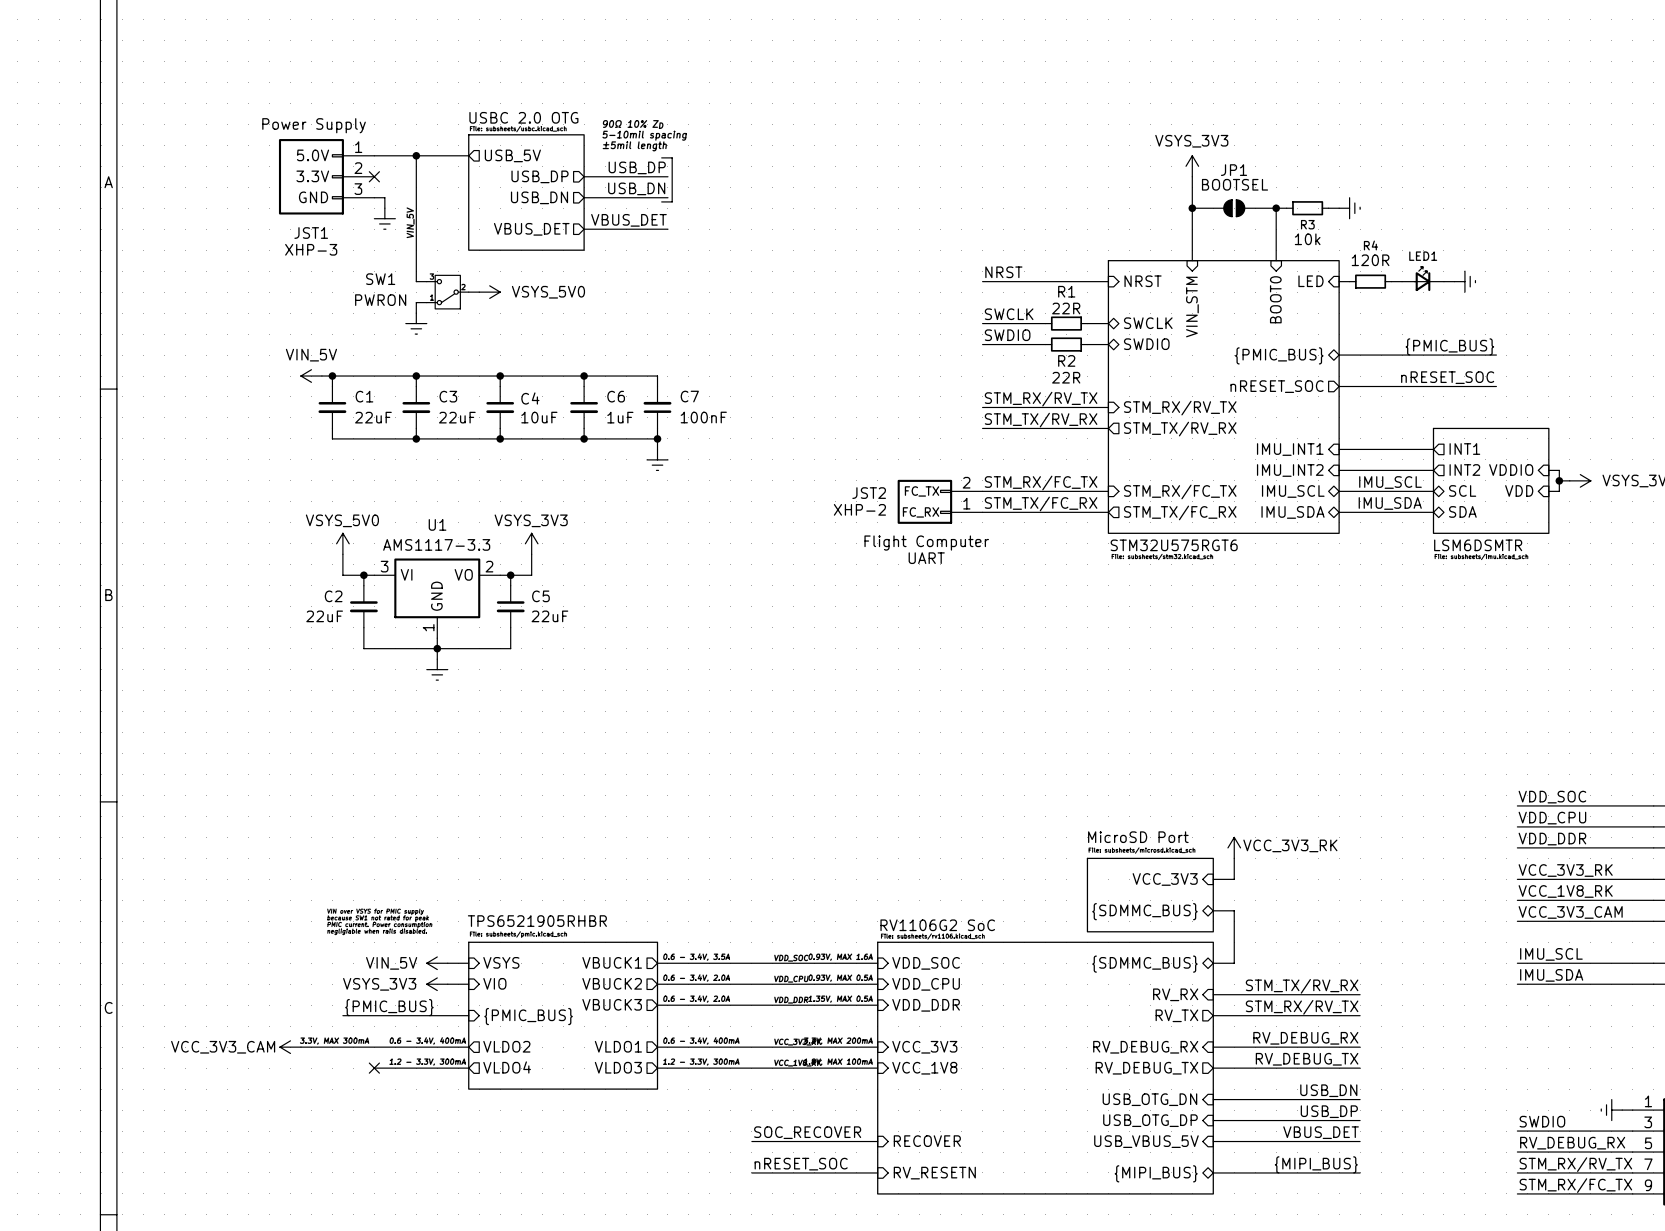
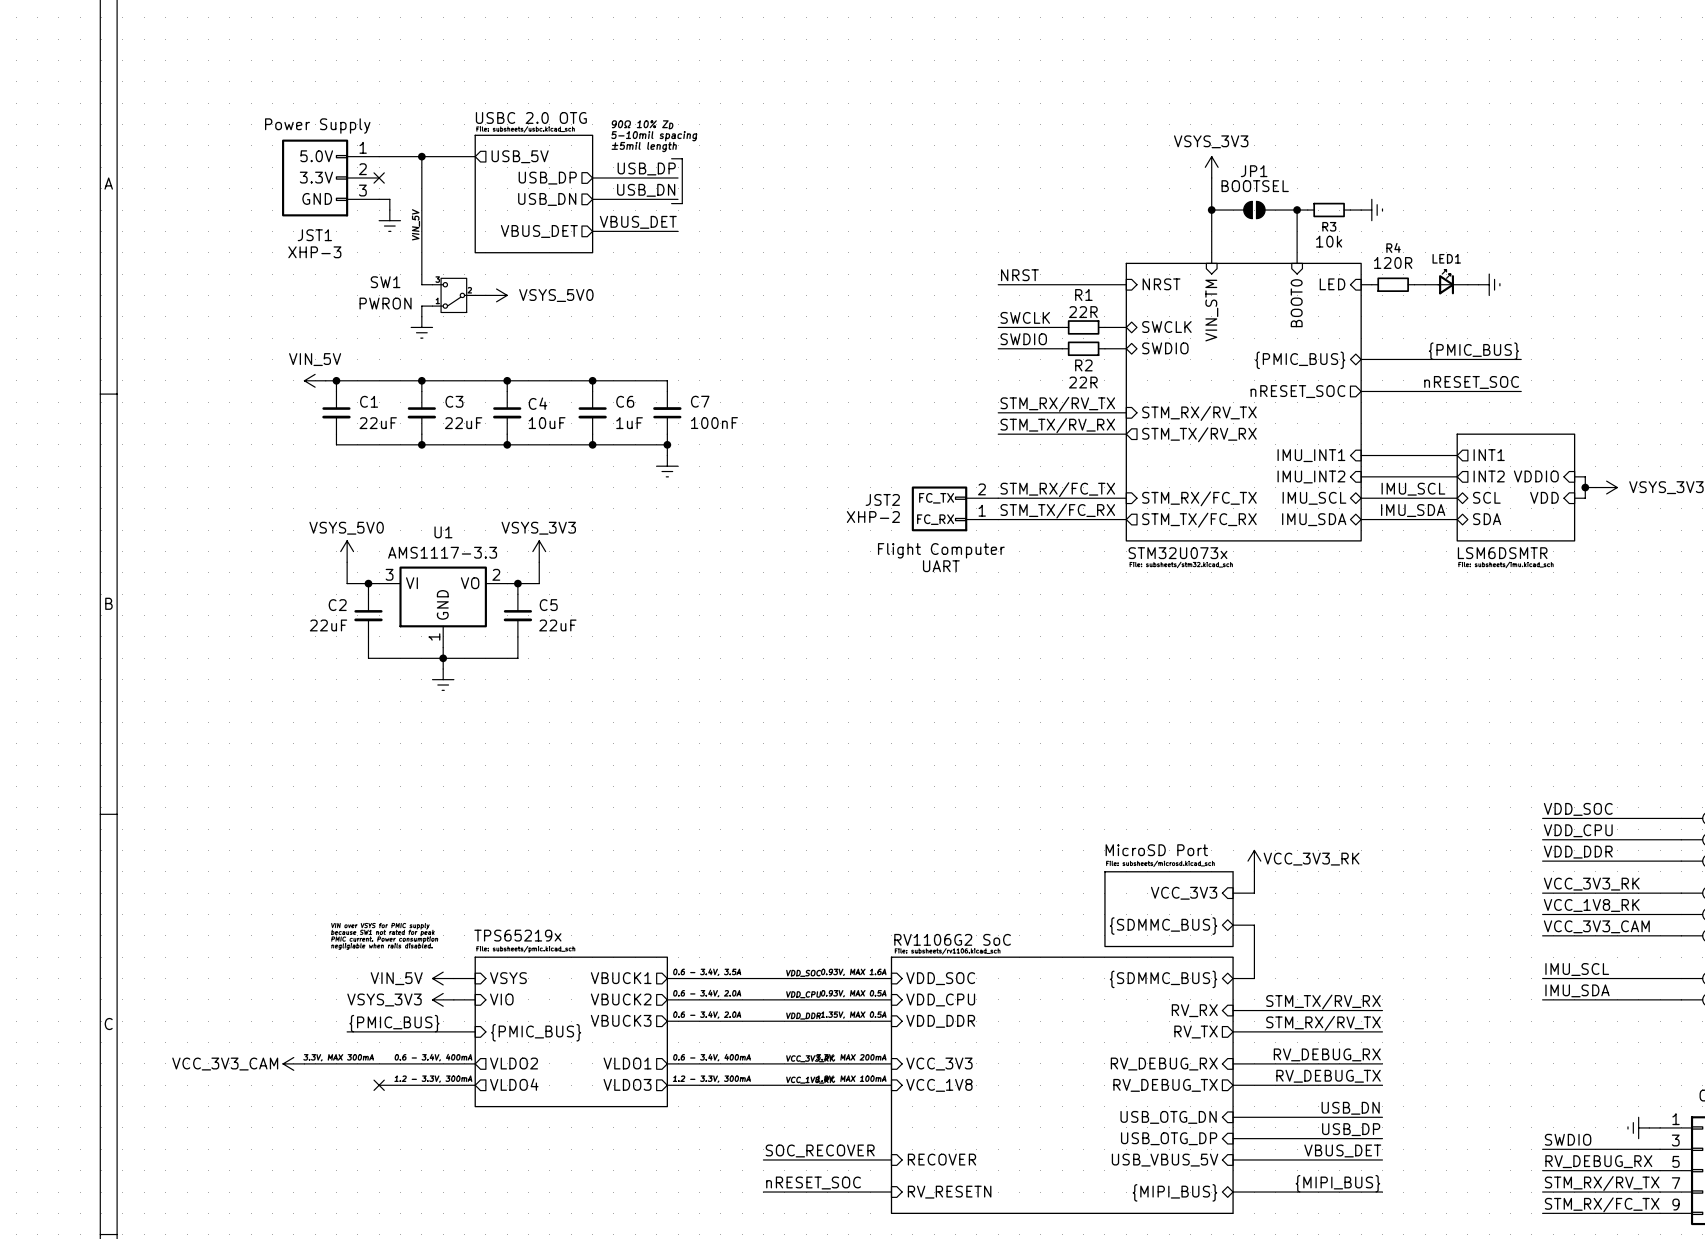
sheet STM32U575RGT6 name: STM32U575RGT6 (1174, 545) -> STM32U073x (1177, 553)
sheet TPS6521905RHBR name: TPS6521905RHBR (537, 921) -> TPS65219x (517, 935)

